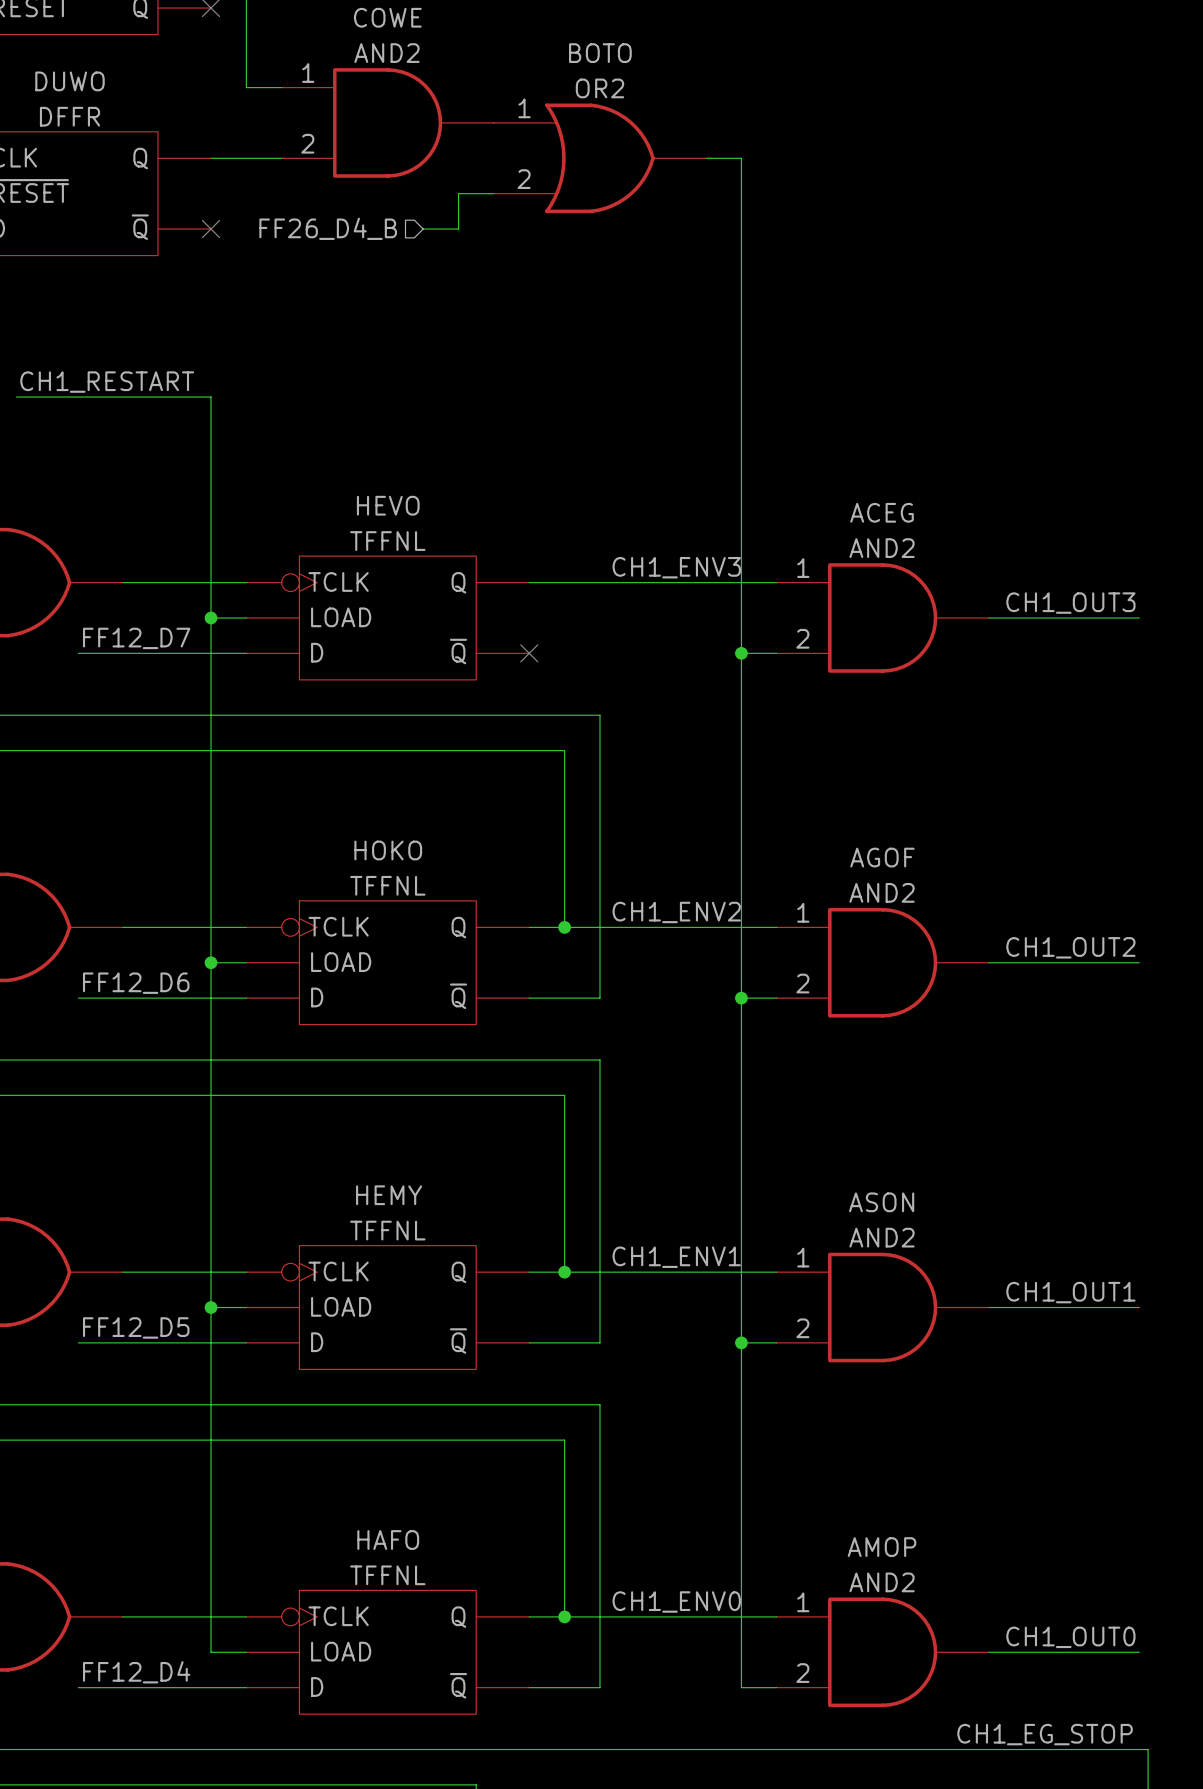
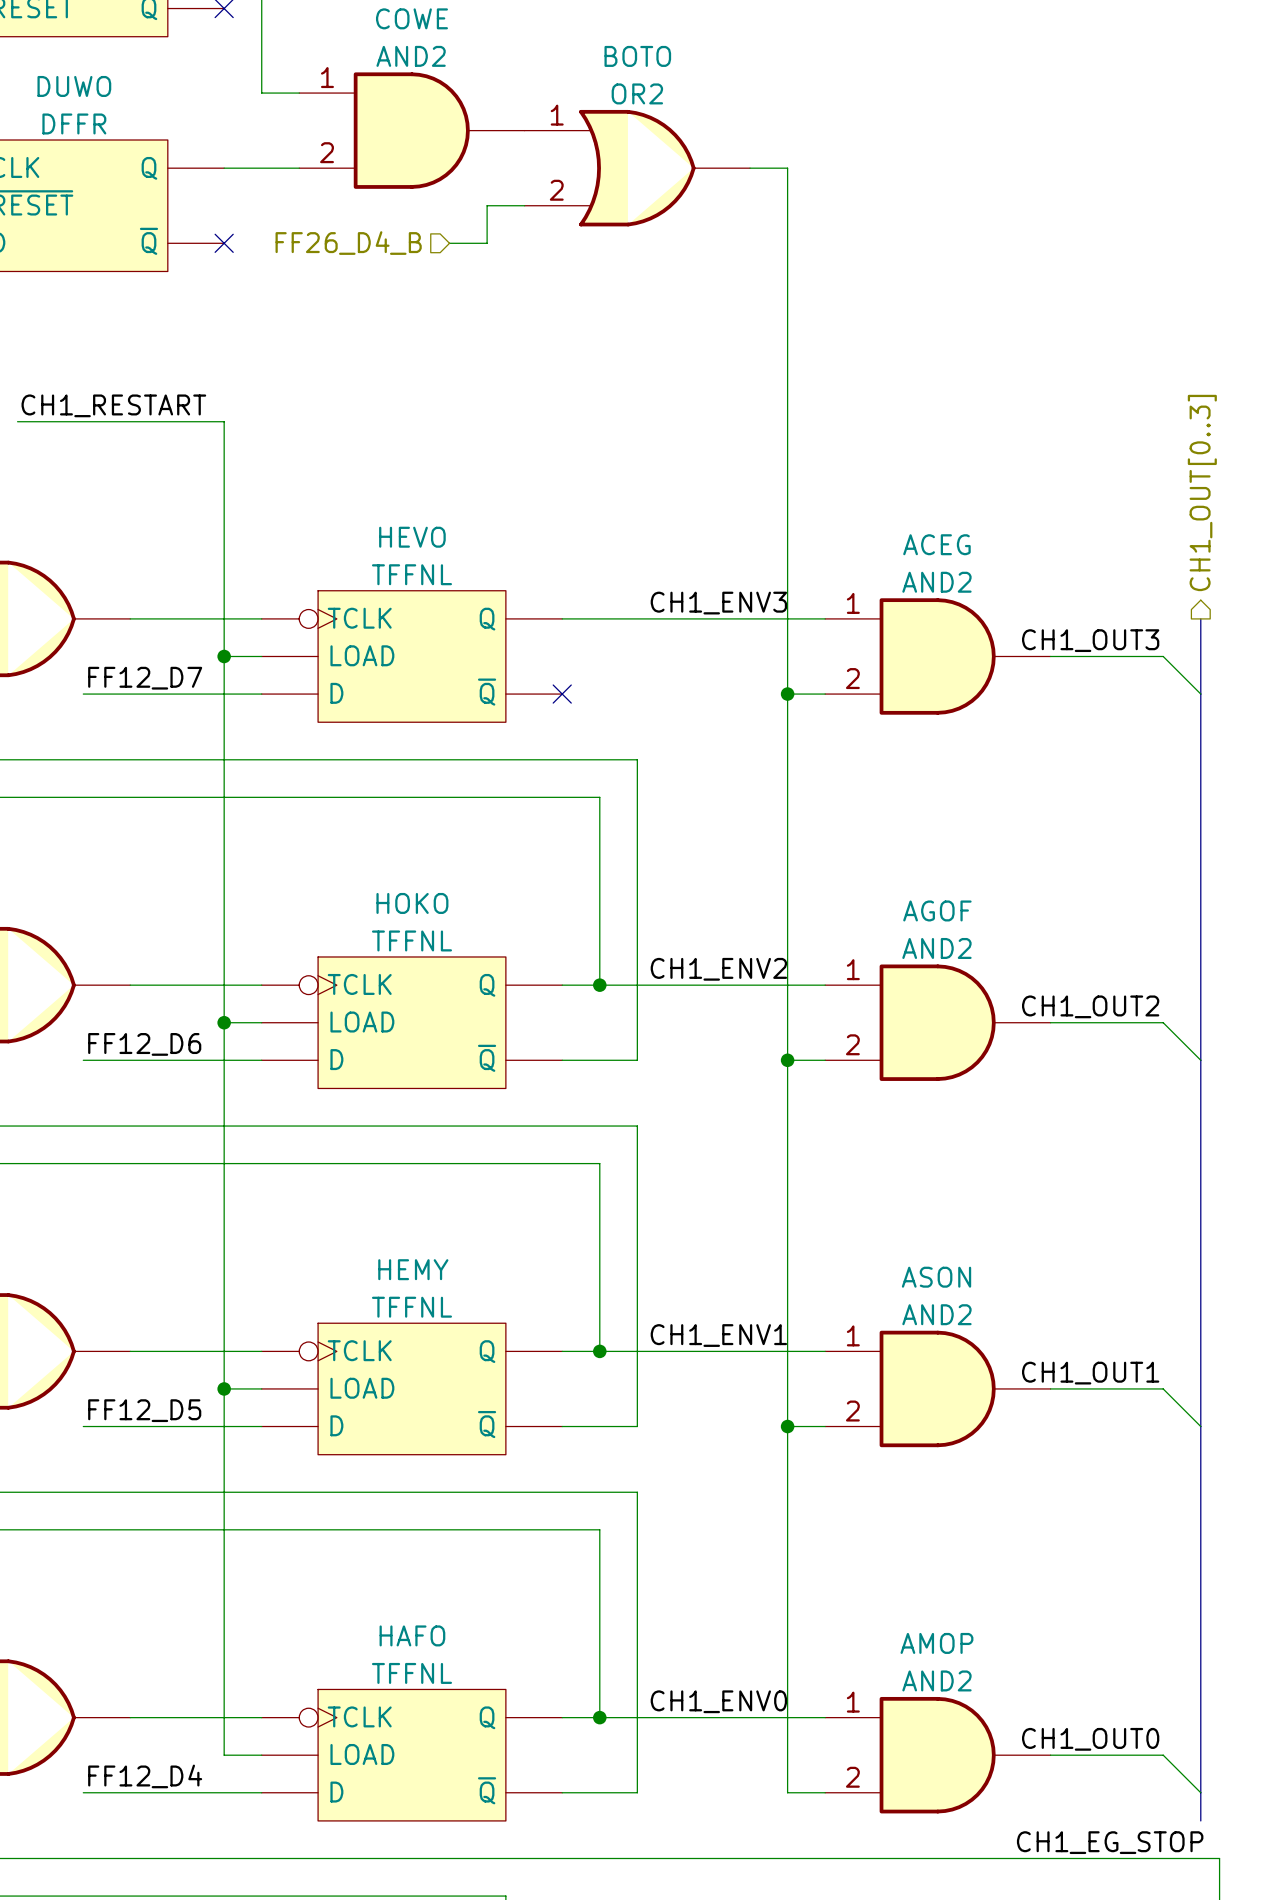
hierarchical label: none -> CH1_OUT[0..3] (1202, 492)
bus: none -> (1200, 618) (1200, 1820)
label position: CH1_OUT3 (1070, 603) -> CH1_OUT3 (1090, 640)
wire: (1095, 618) (1139, 618) -> (1163, 656) (1200, 694)
label position: CH1_OUT2 (1070, 947) -> CH1_OUT2 (1090, 1006)
wire: (1095, 962) (1139, 962) -> (1163, 1022) (1200, 1060)
label position: CH1_OUT1 (1070, 1292) -> CH1_OUT1 (1090, 1373)
wire: (1095, 1307) (1139, 1307) -> (1163, 1388) (1200, 1426)
label position: CH1_OUT0 (1070, 1637) -> CH1_OUT0 (1090, 1739)
wire: (1095, 1652) (1139, 1652) -> (1163, 1755) (1200, 1792)

